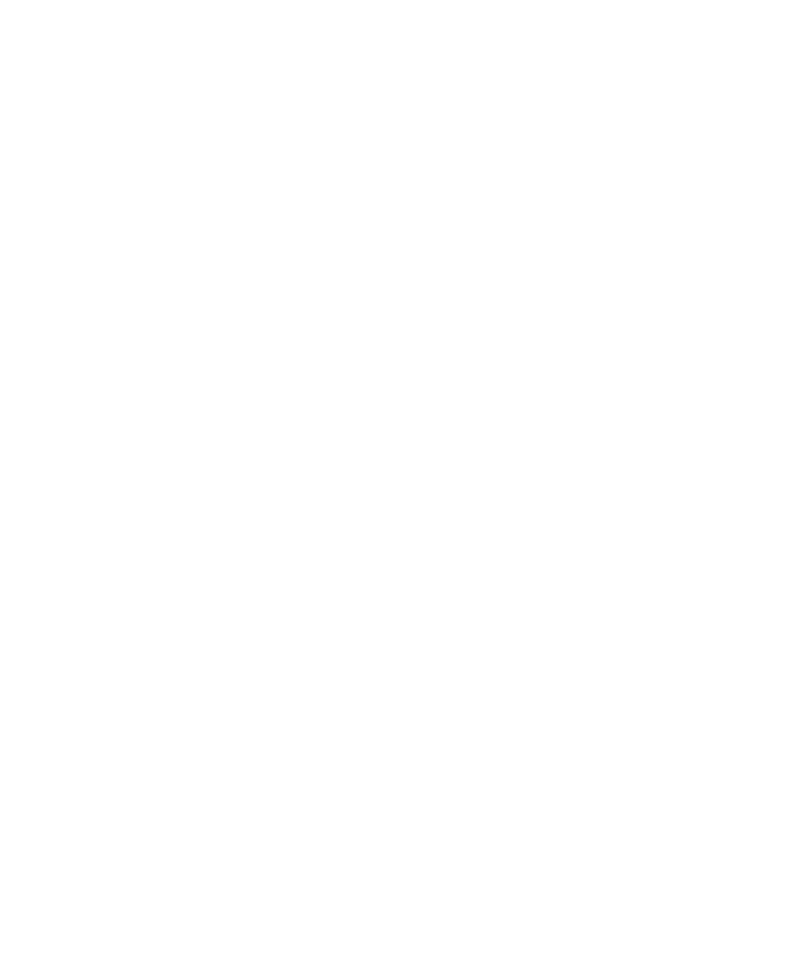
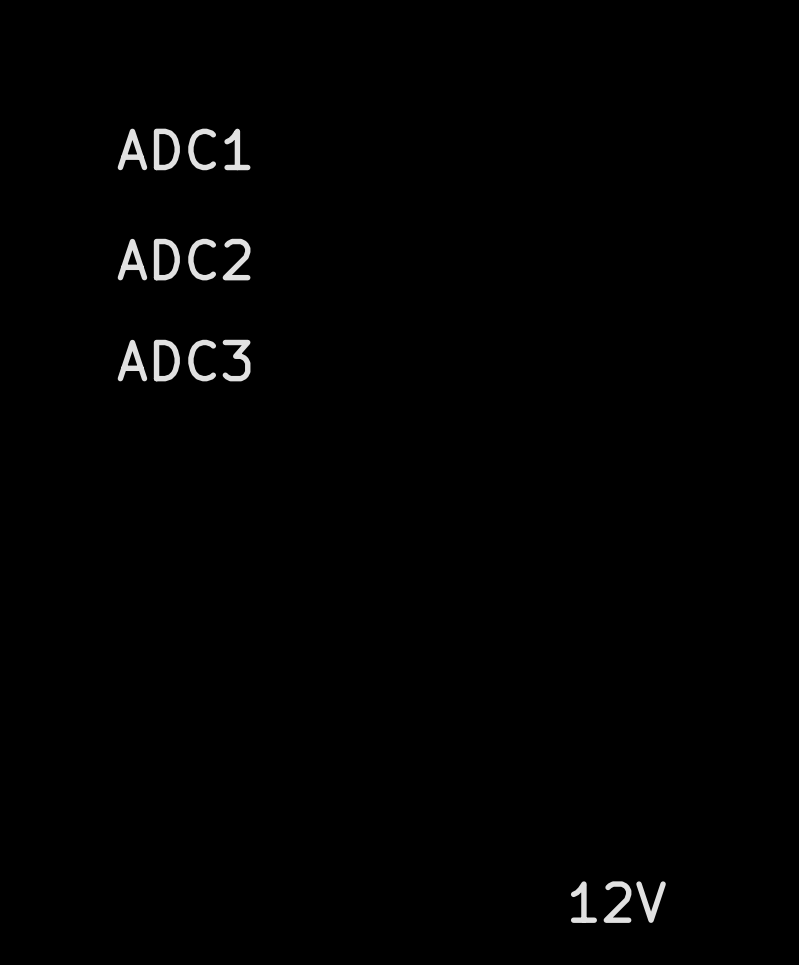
text: none -> ADC1 (184, 149)
text: none -> ADC2 (184, 259)
text: none -> ADC3 (184, 360)
text: none -> 12V (618, 902)

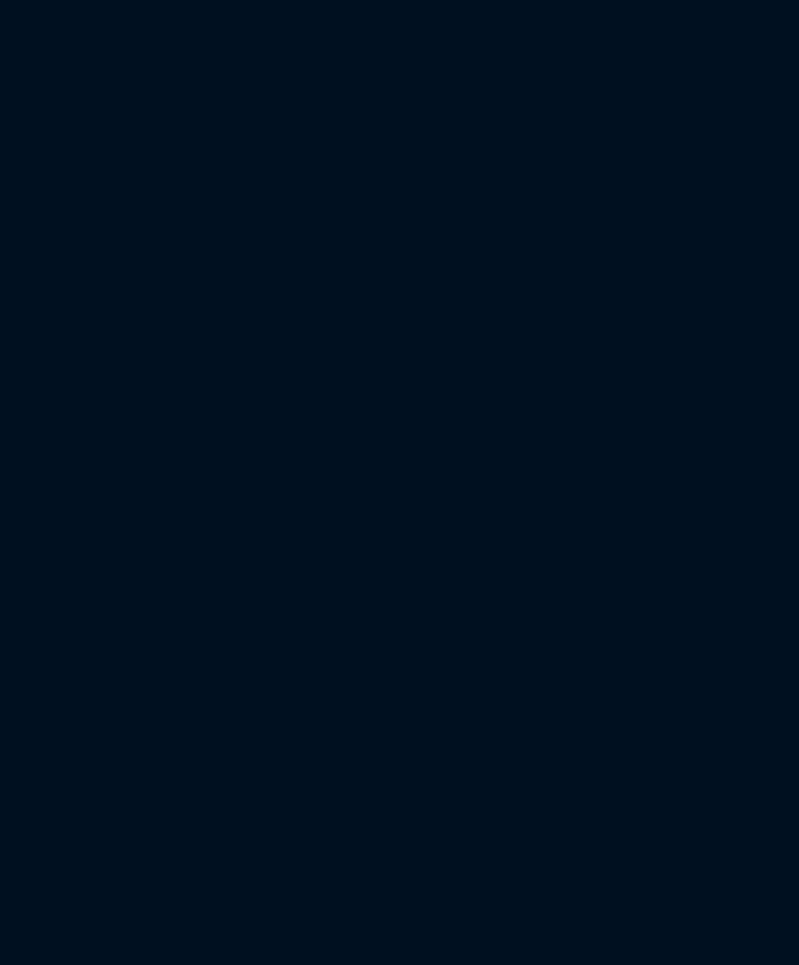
text: ADC1 (184, 149) -> none
text: ADC2 (184, 259) -> none
text: ADC3 (184, 360) -> none
text: 12V (618, 902) -> none

